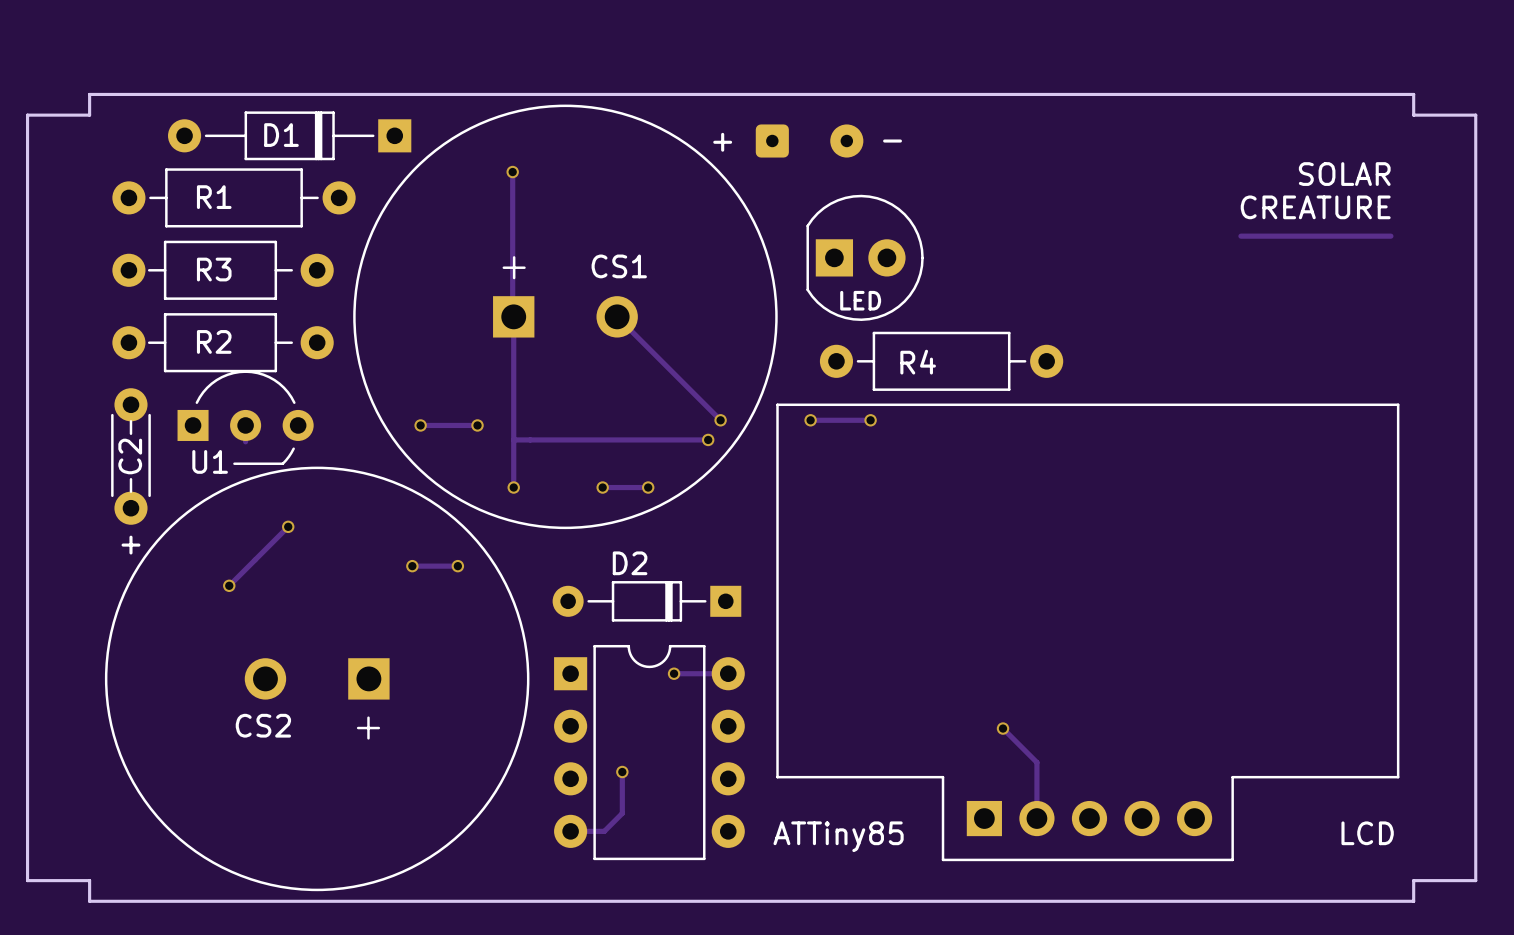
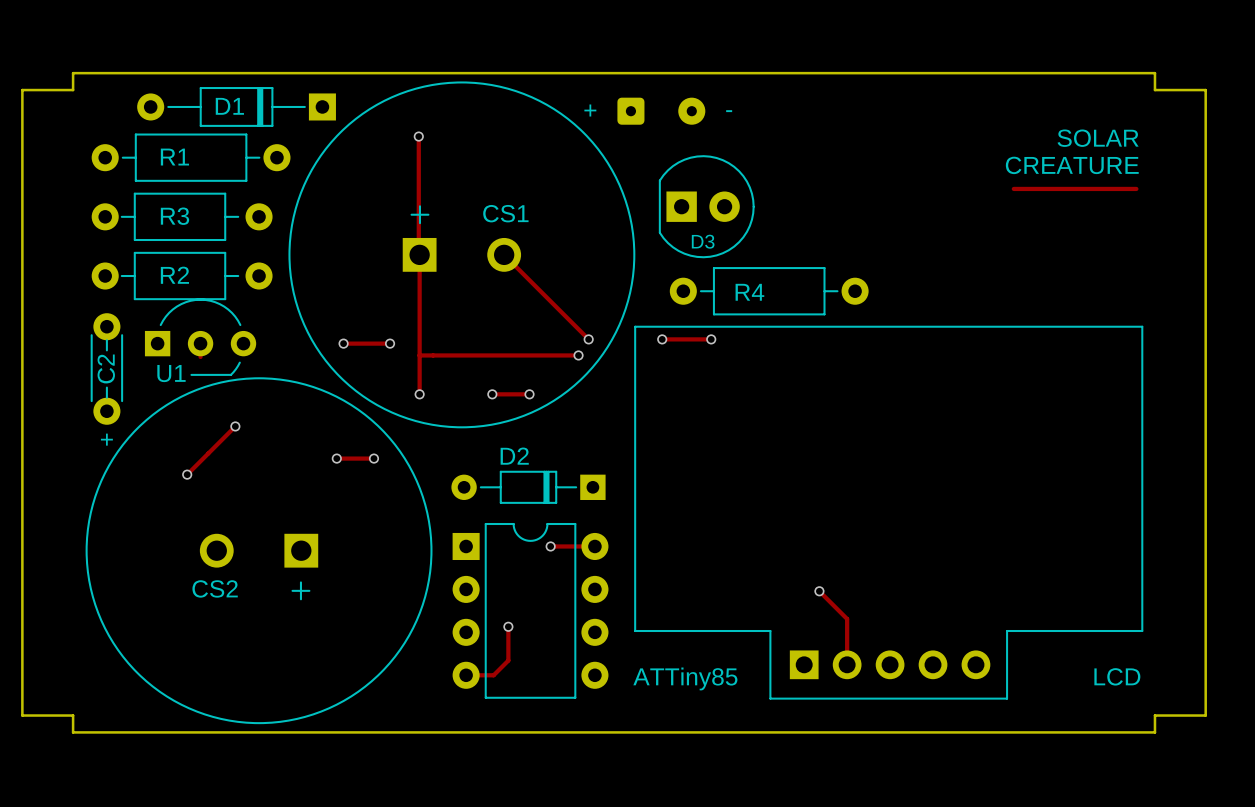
LED name: LED (860, 300) -> D3 (703, 241)

